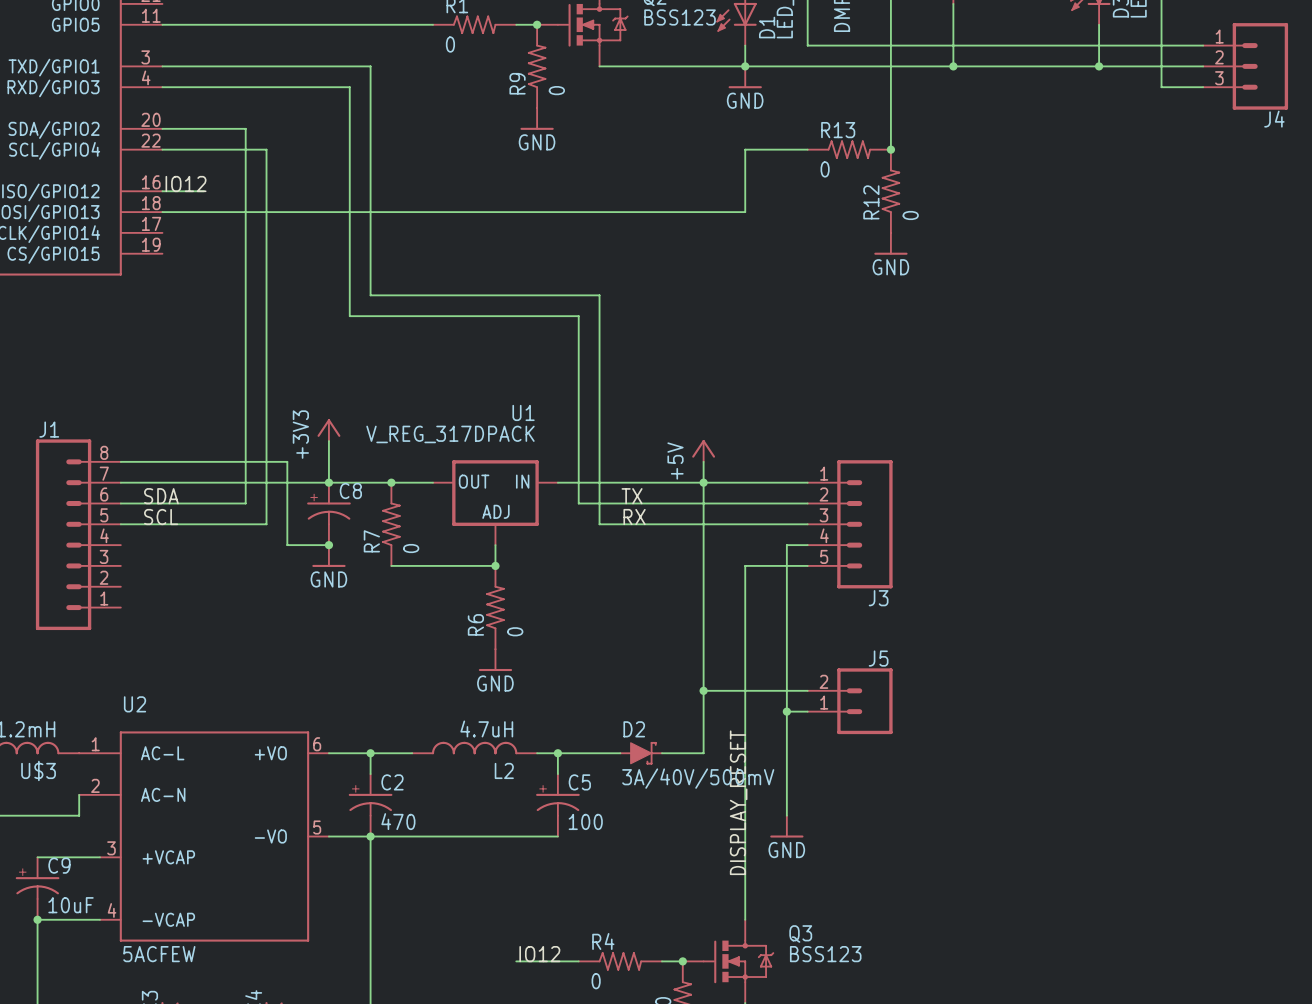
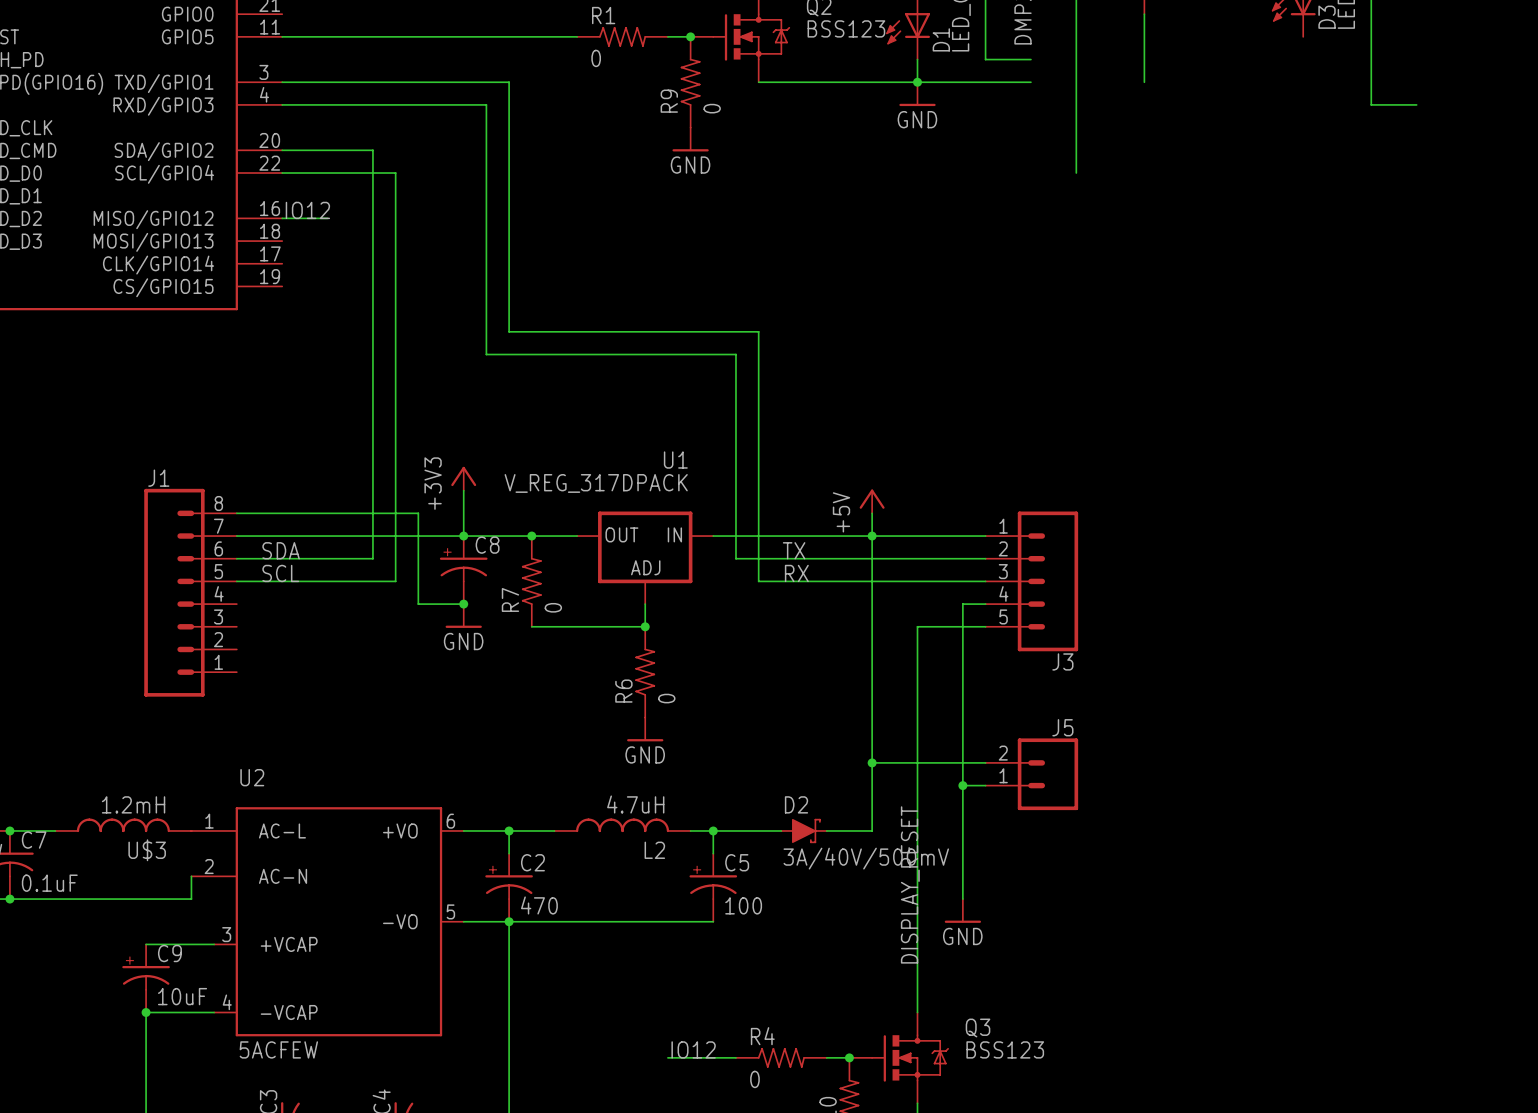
wire: (1099, 24) (1099, 66) -> none
wire: (849, 45) (1203, 45) -> none
wire: (849, 66) (1203, 66) -> none
junction: (953, 66) -> none
junction: (1099, 66) -> none
J4: (1245, 66) -> none
wire: (807, 149) (745, 149) (745, 212) (162, 212) -> none
R13: 0 (849, 149) -> none
junction: (890, 149) -> none
R12: 0 (890, 191) -> none
power symbol: GND (890, 243) -> none

